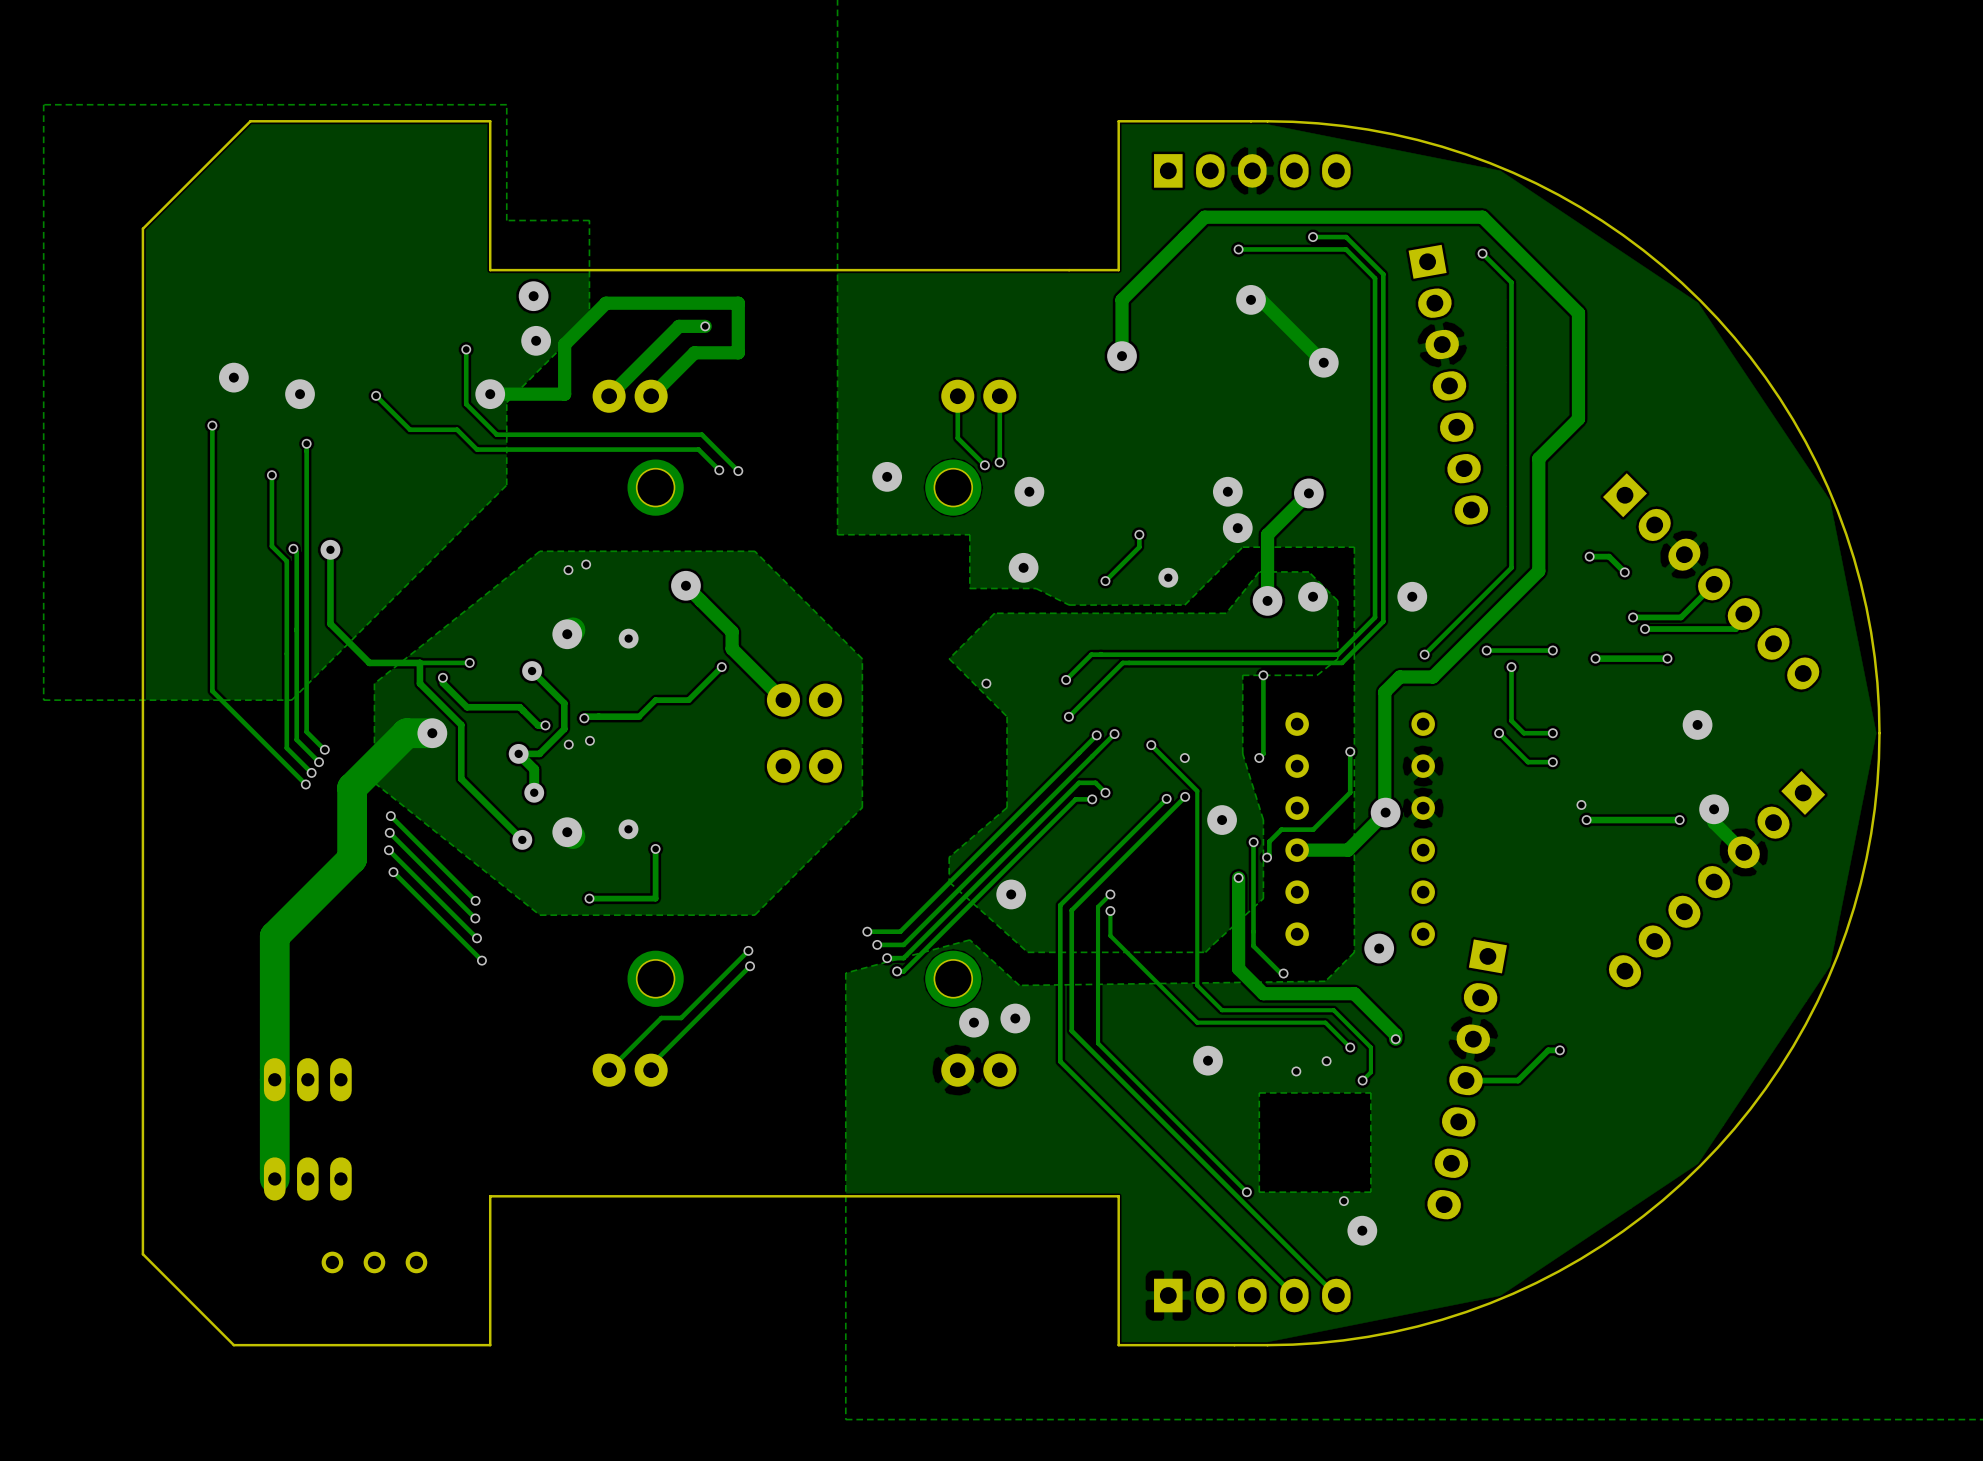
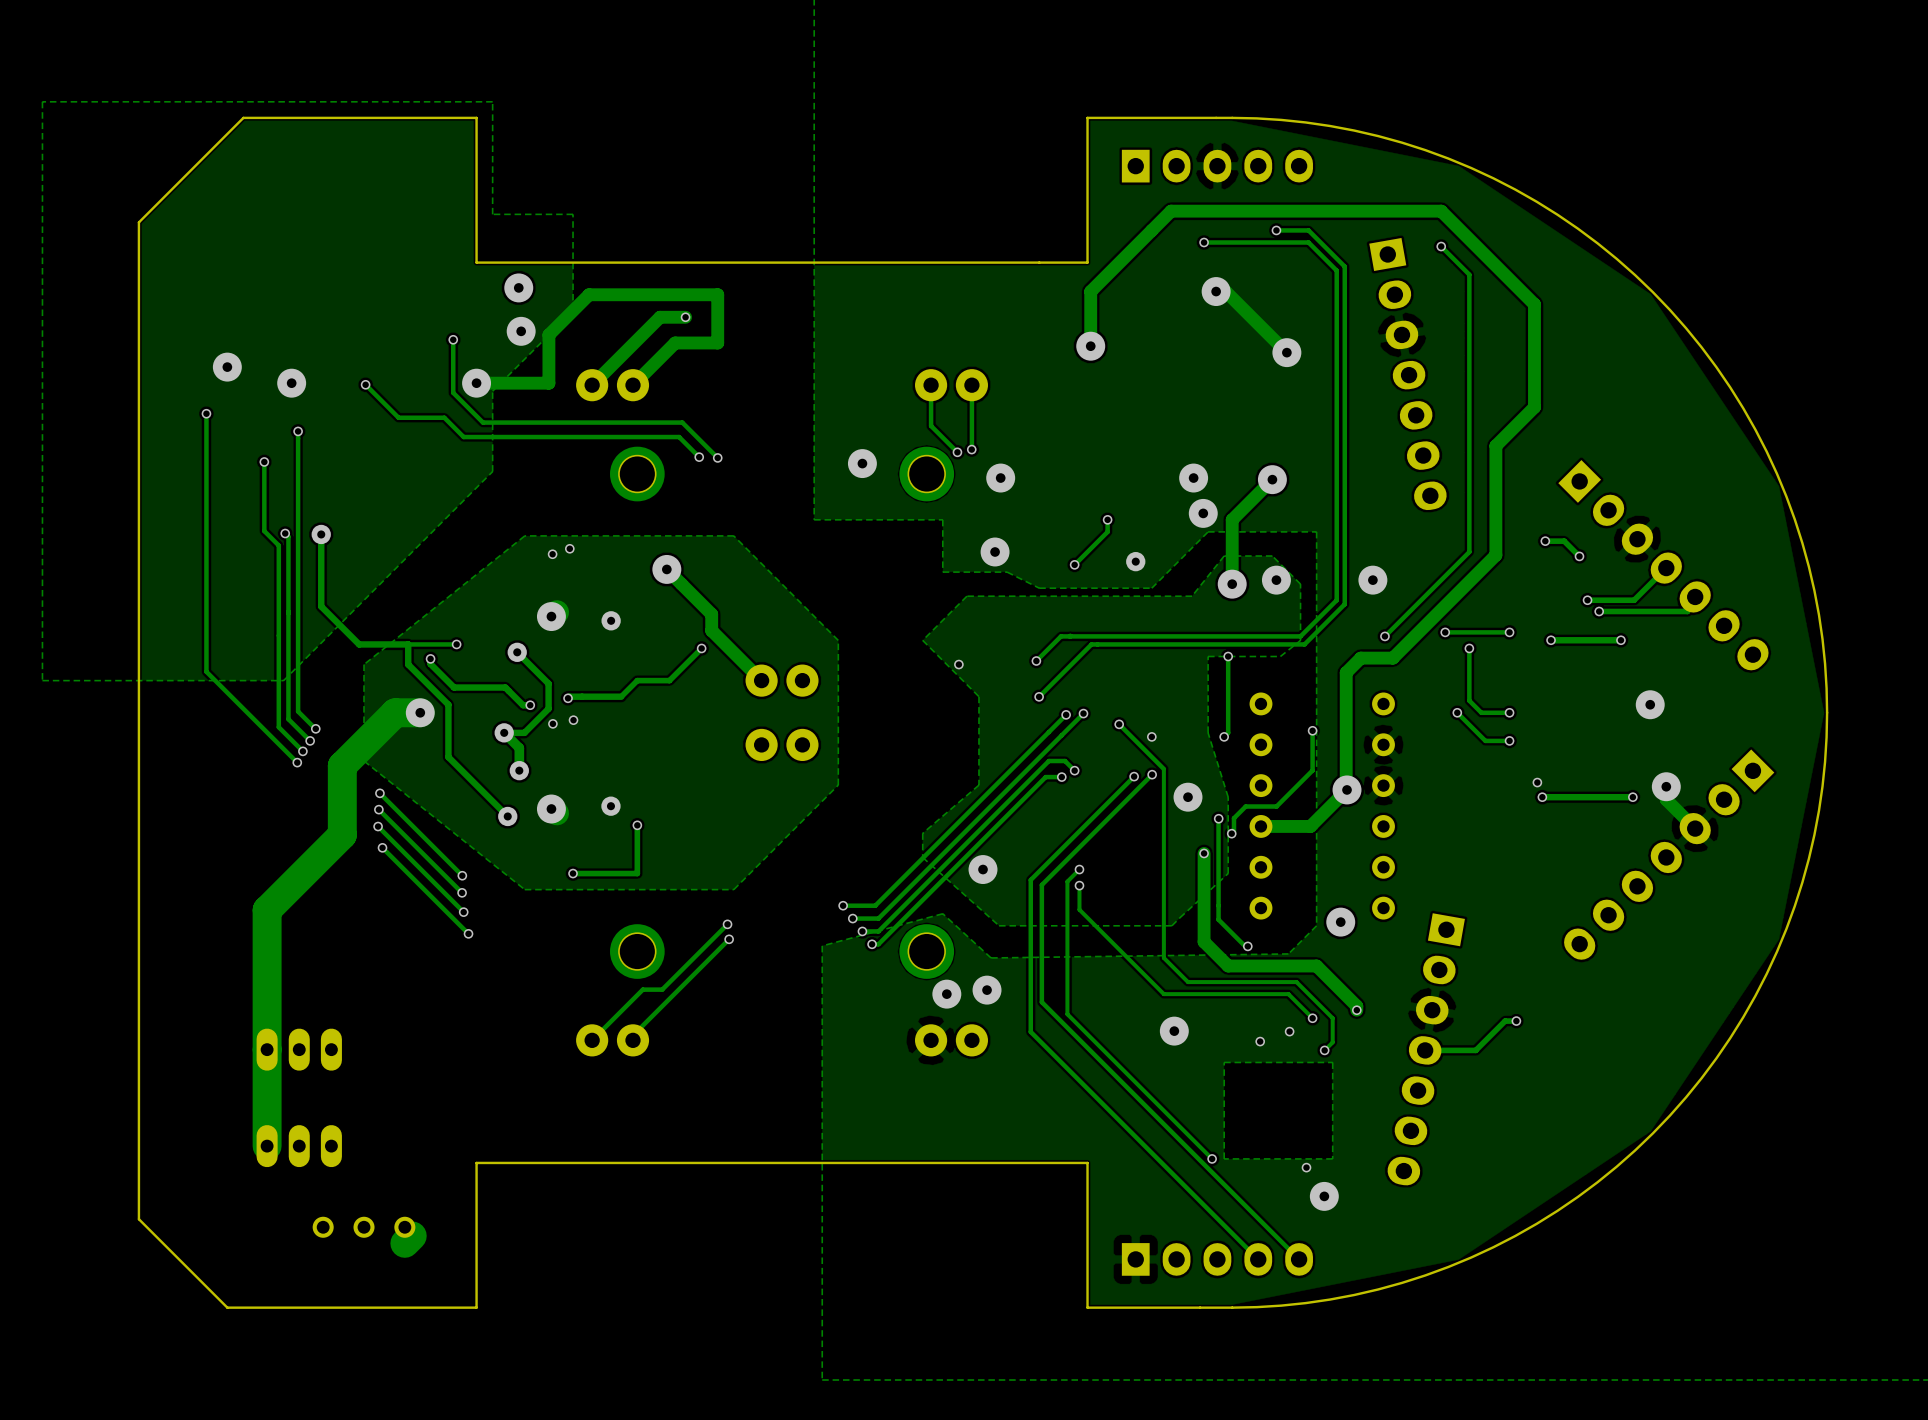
track: none -> (412, 1235) (404, 1243)

